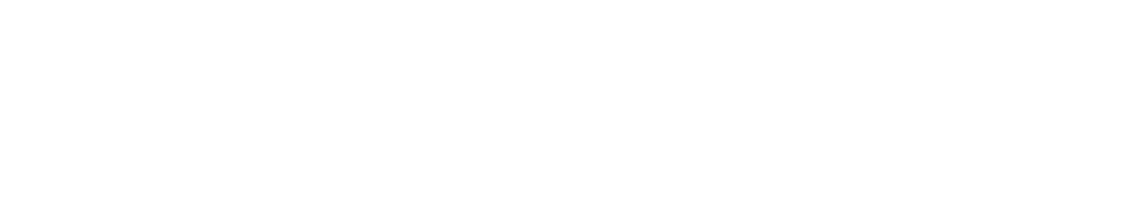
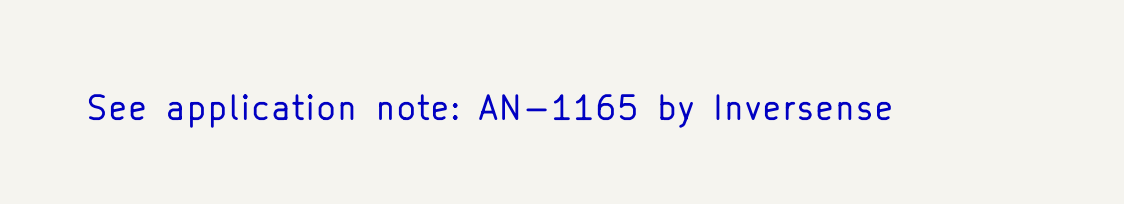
text: none -> See application note: AN-1165 by Inversense (489, 110)

